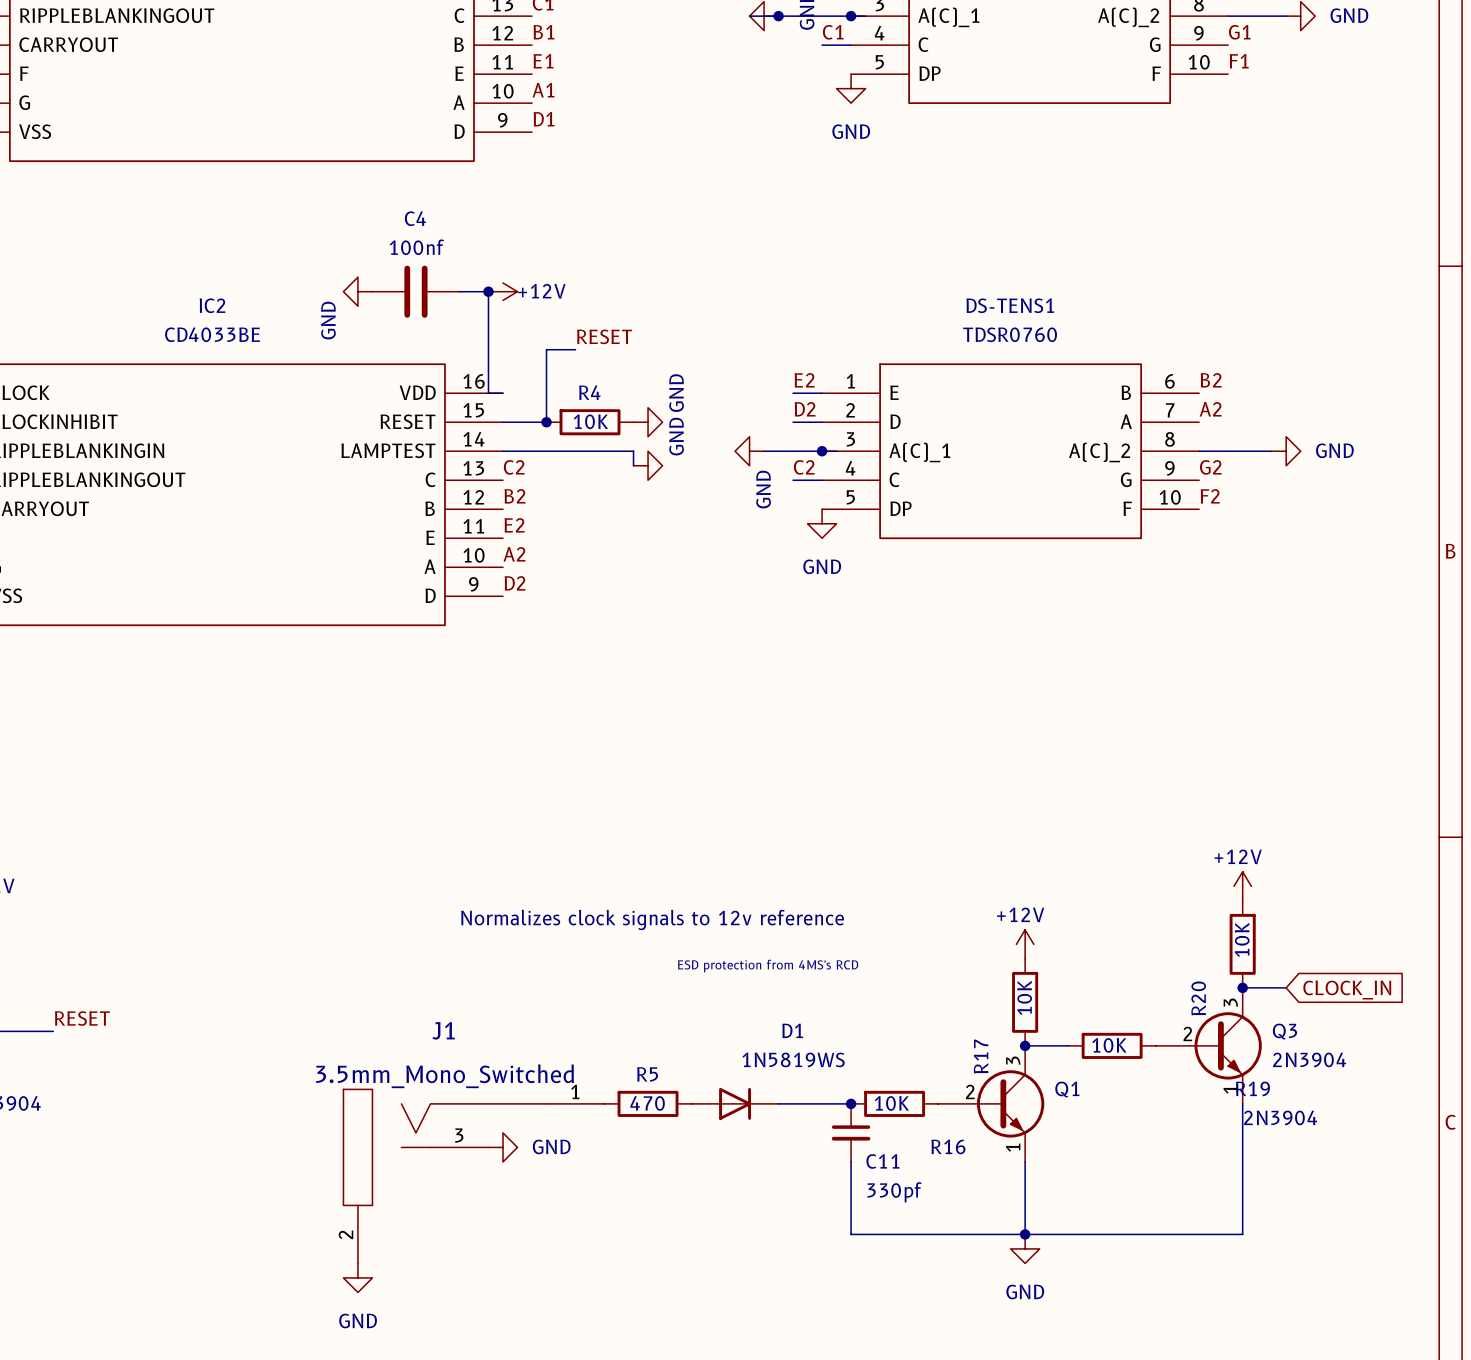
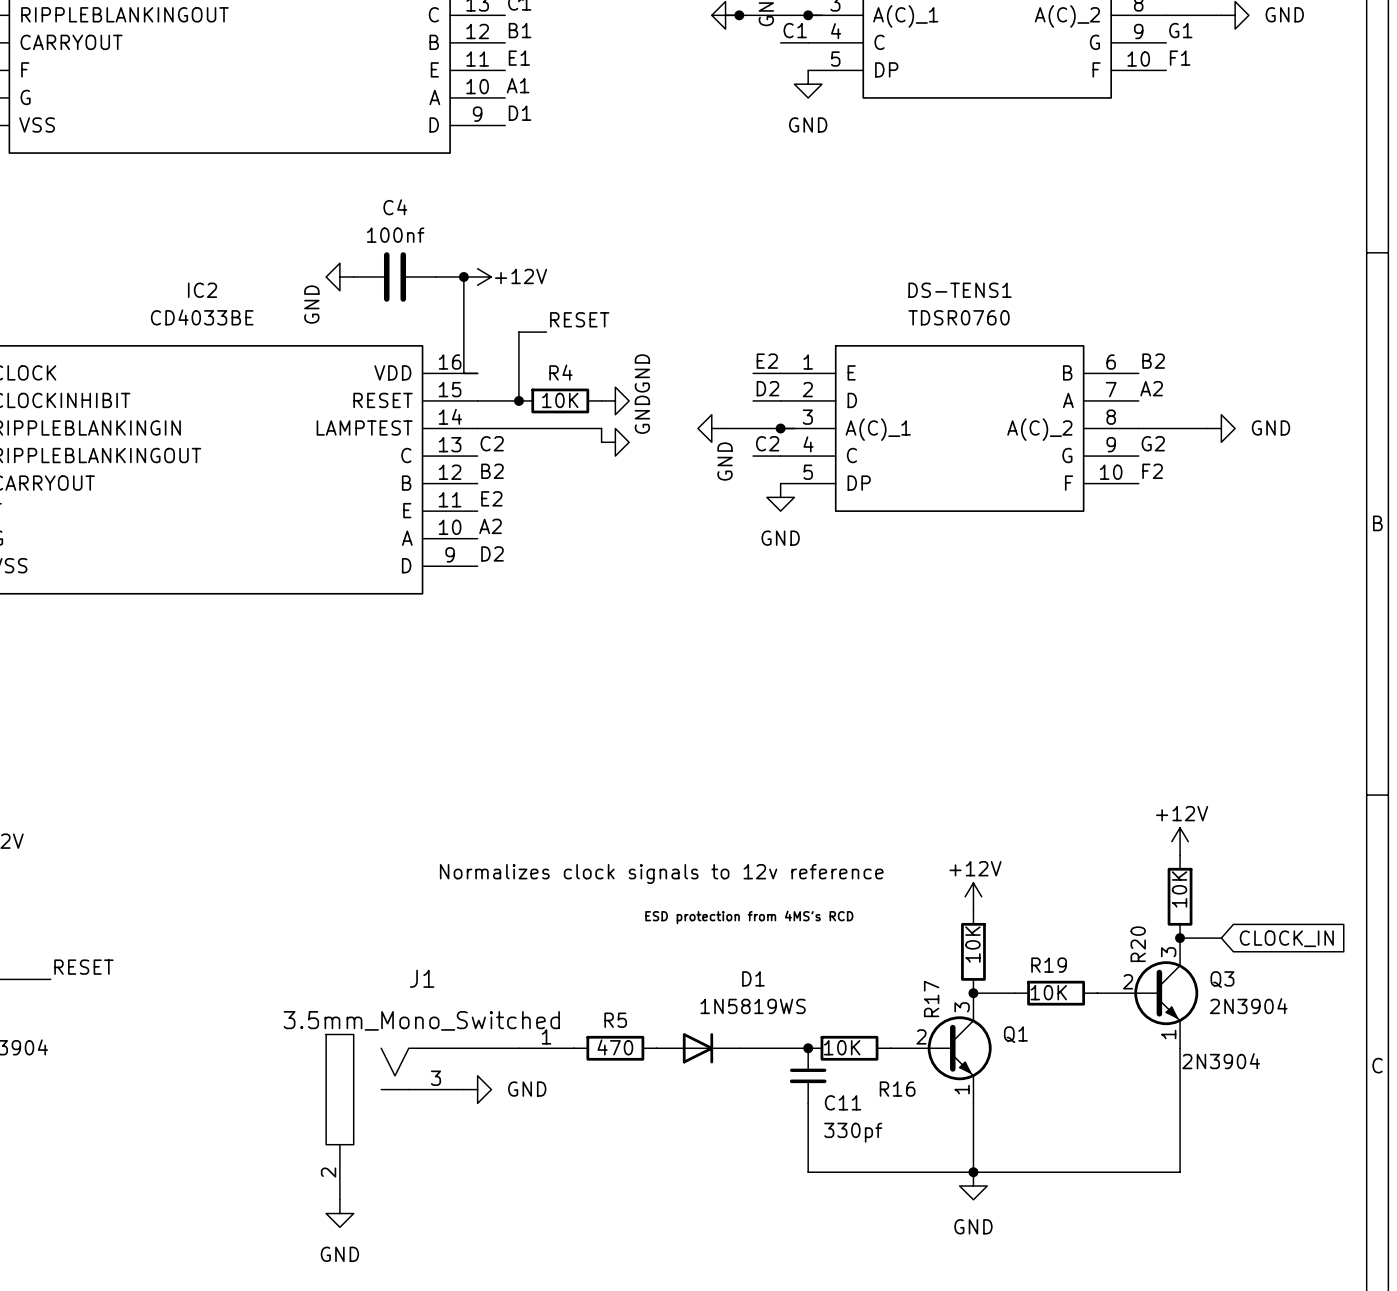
R19 name position: R19 (1252, 1088) -> R19 (1049, 965)

